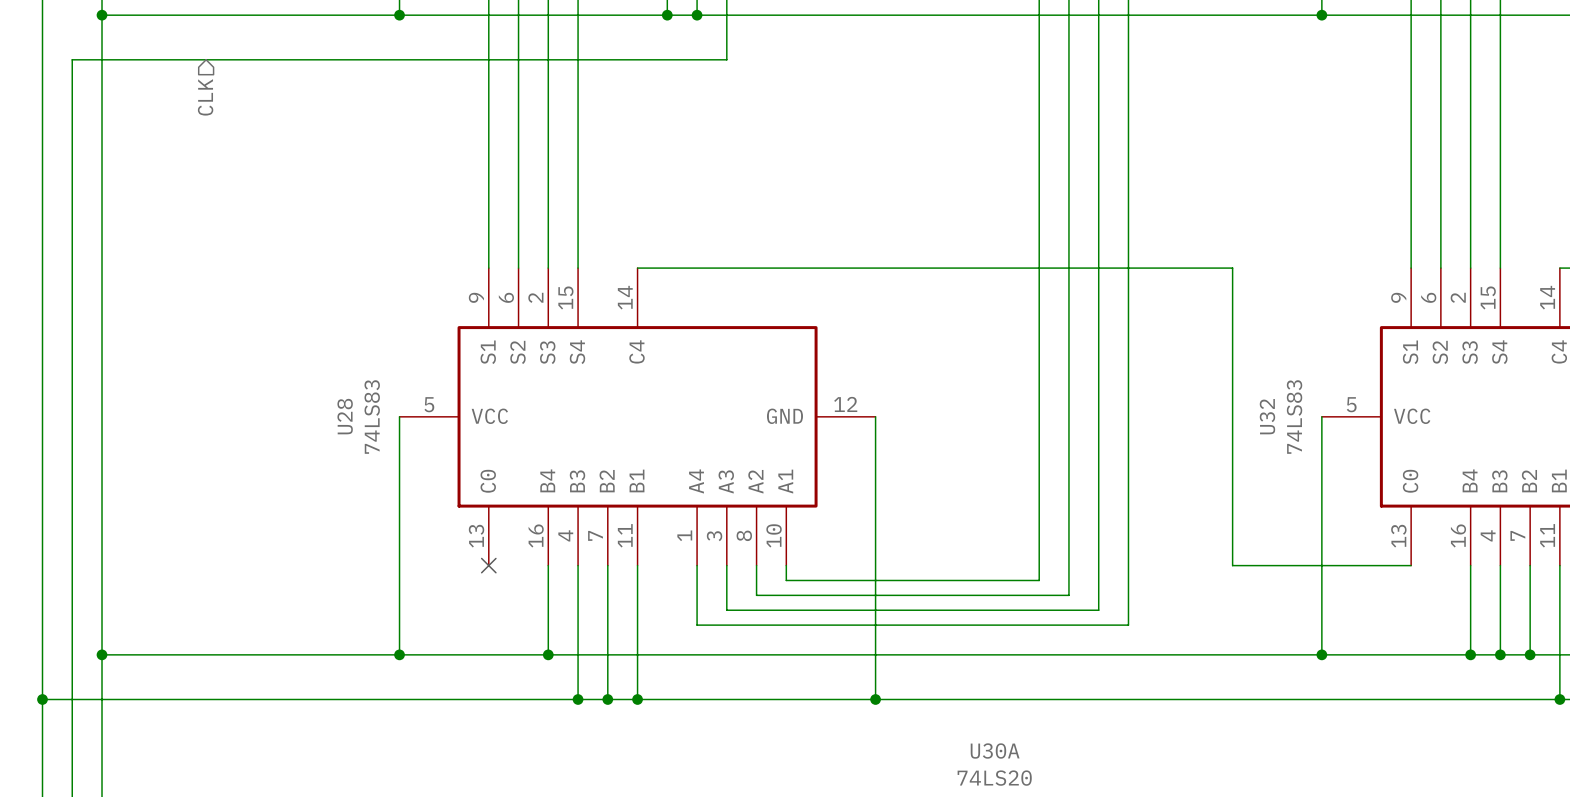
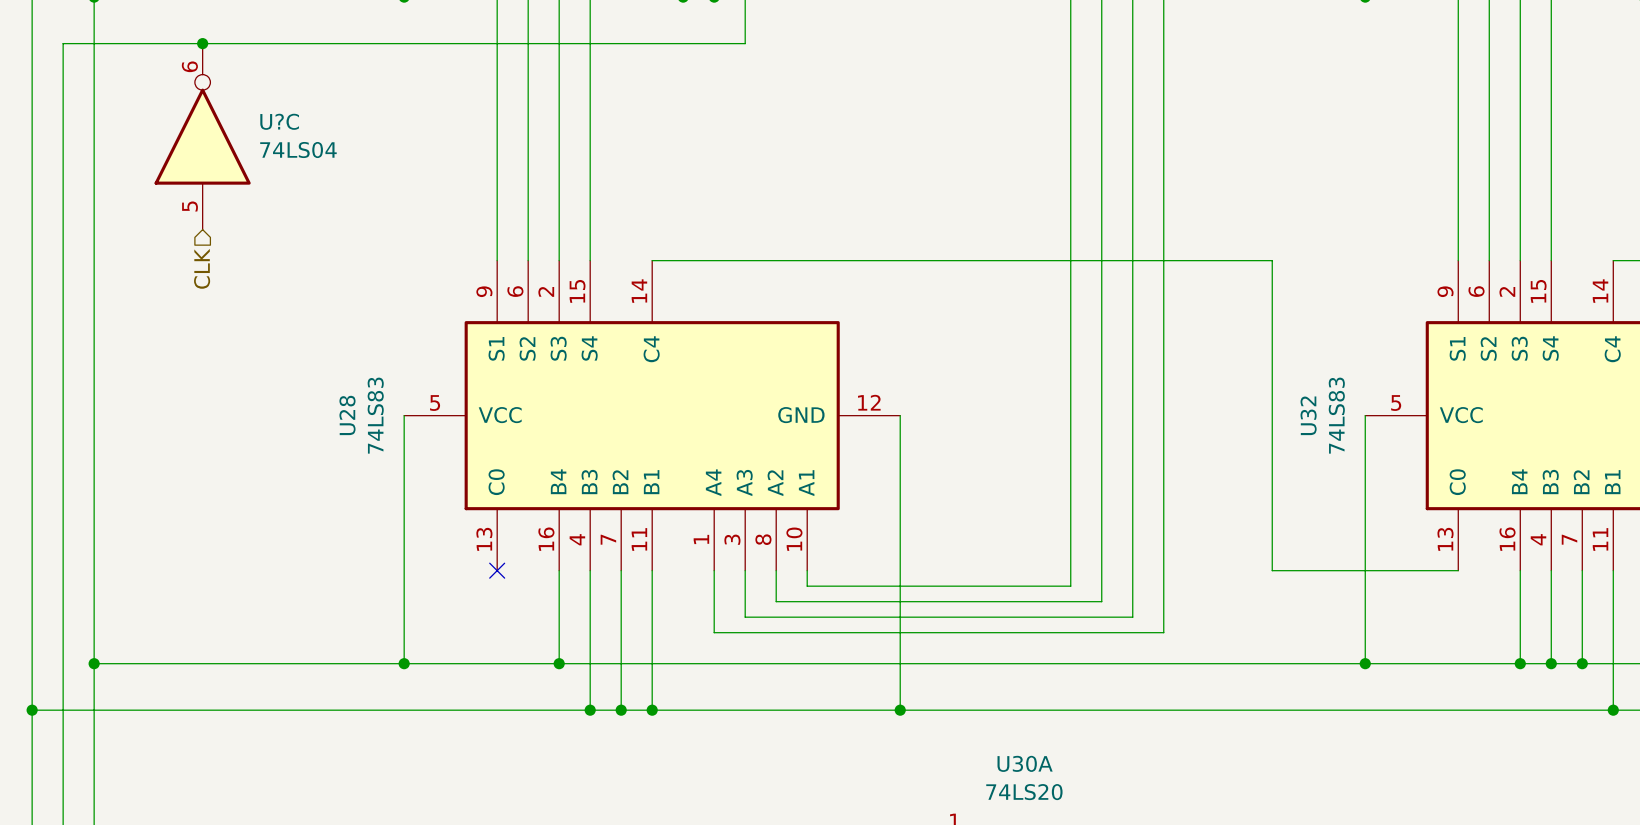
junction: none -> (202, 43)
hierarchical label position: CLK (205, 97) -> CLK (202, 268)
U?C: none -> 74LS04 (202, 136)

